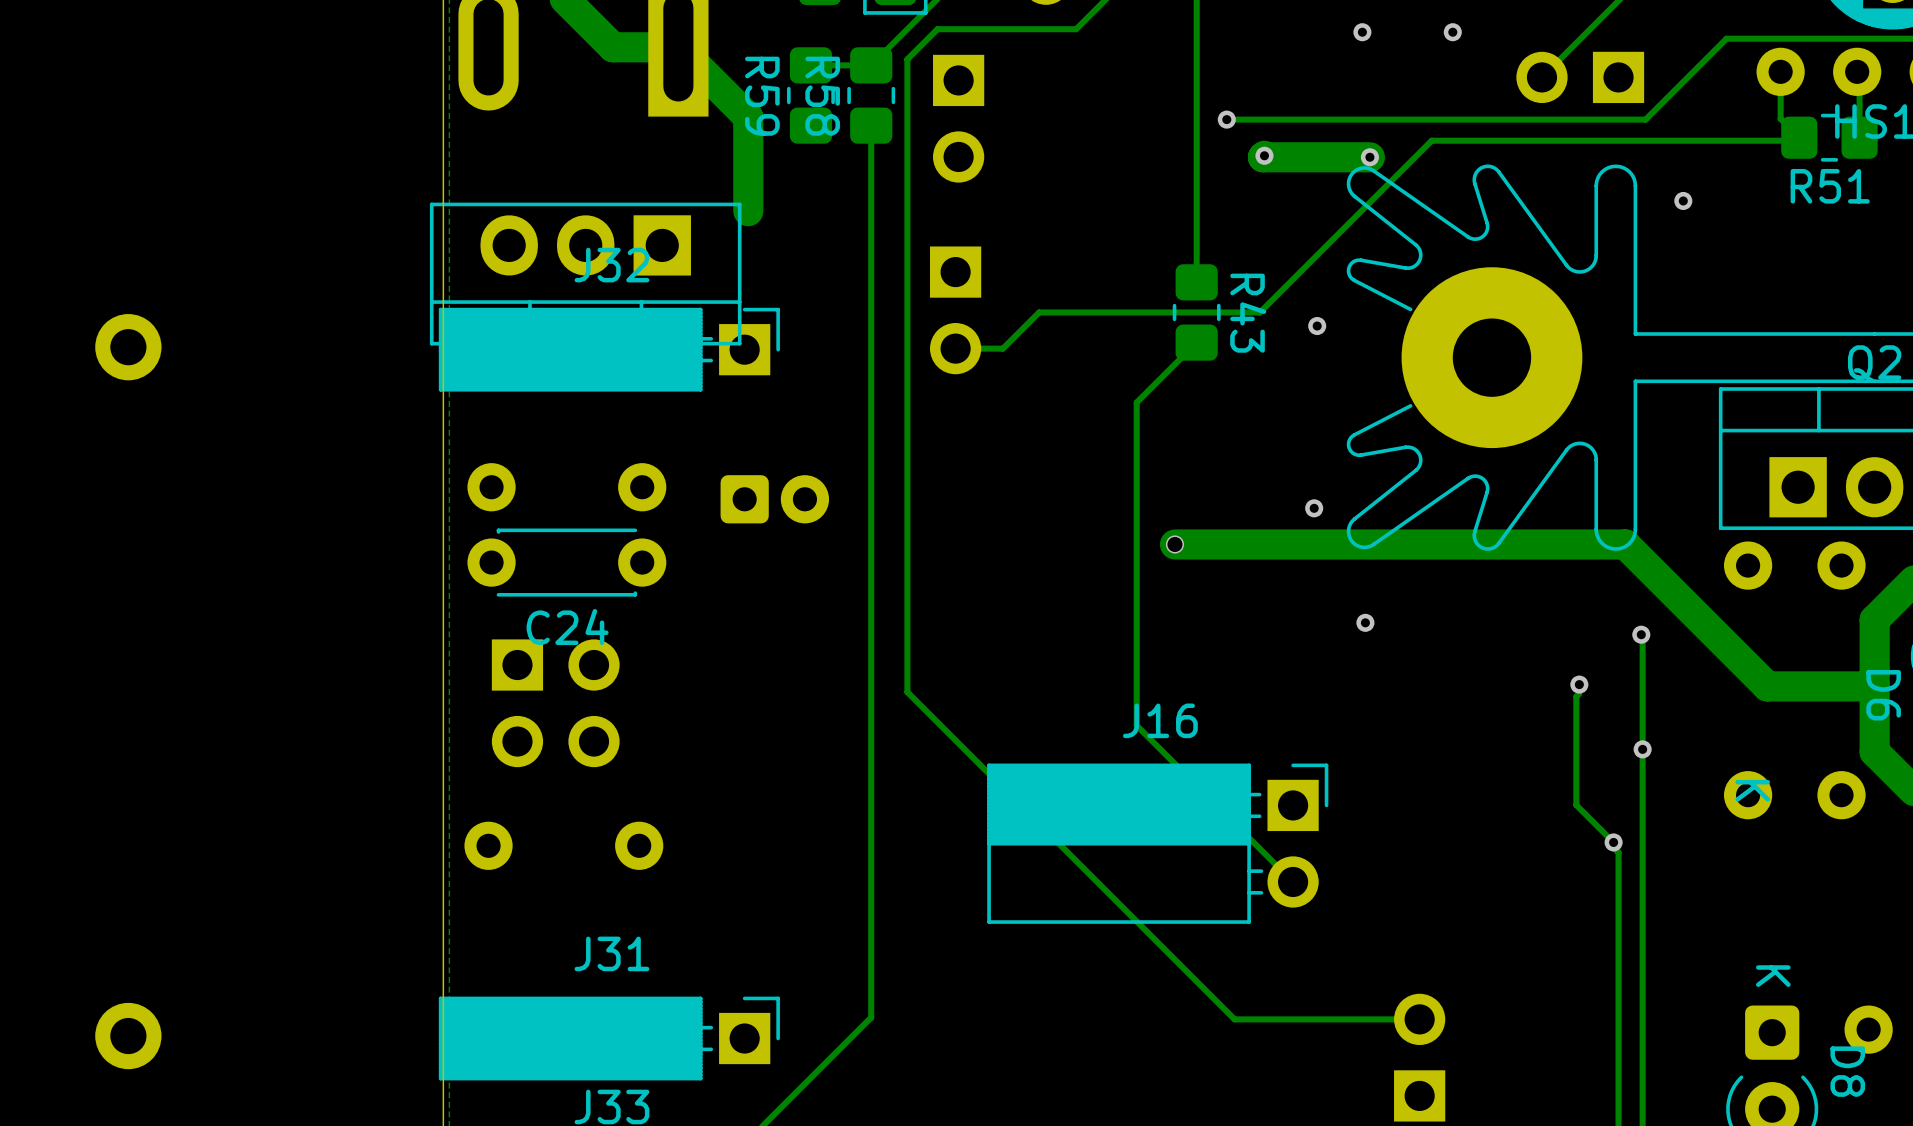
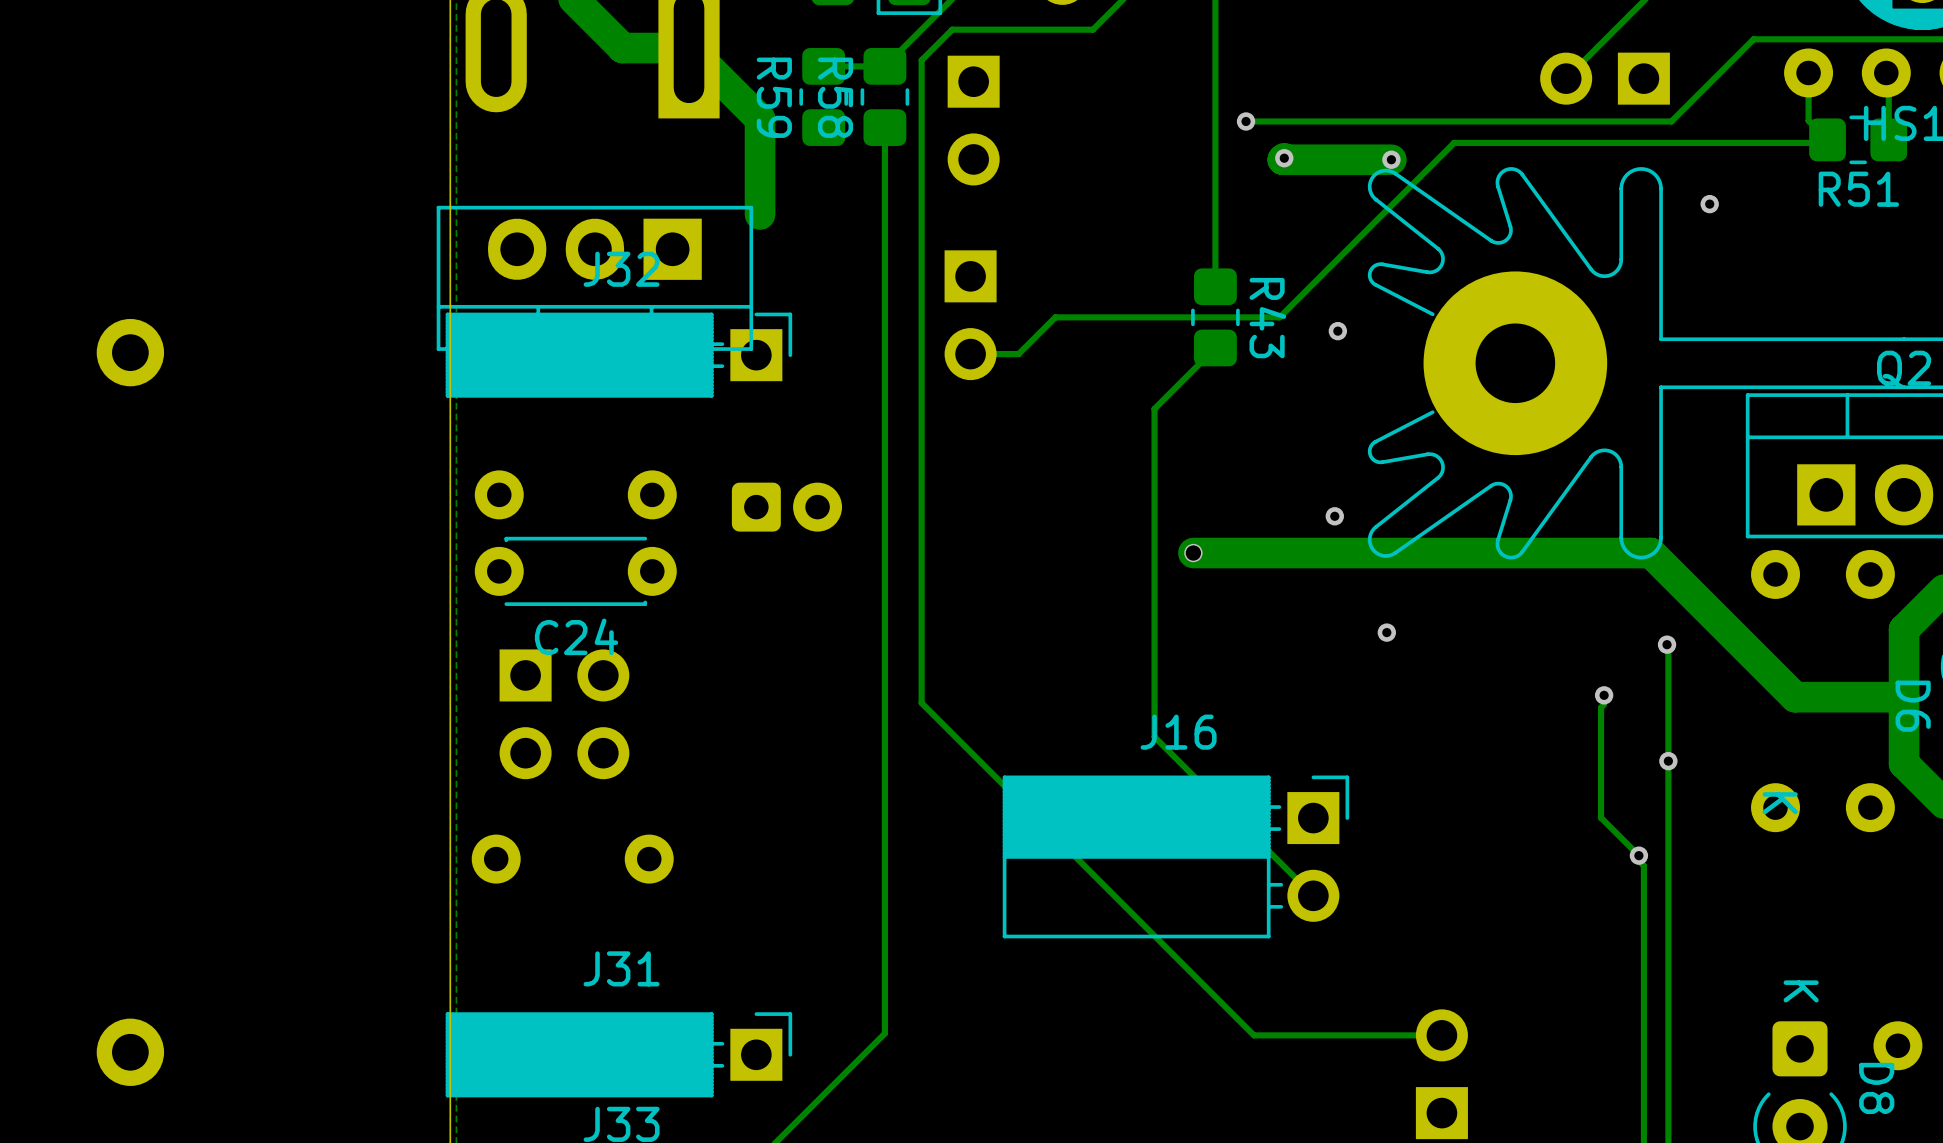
via: (1362, 32) -> none
via: (1452, 32) -> none

